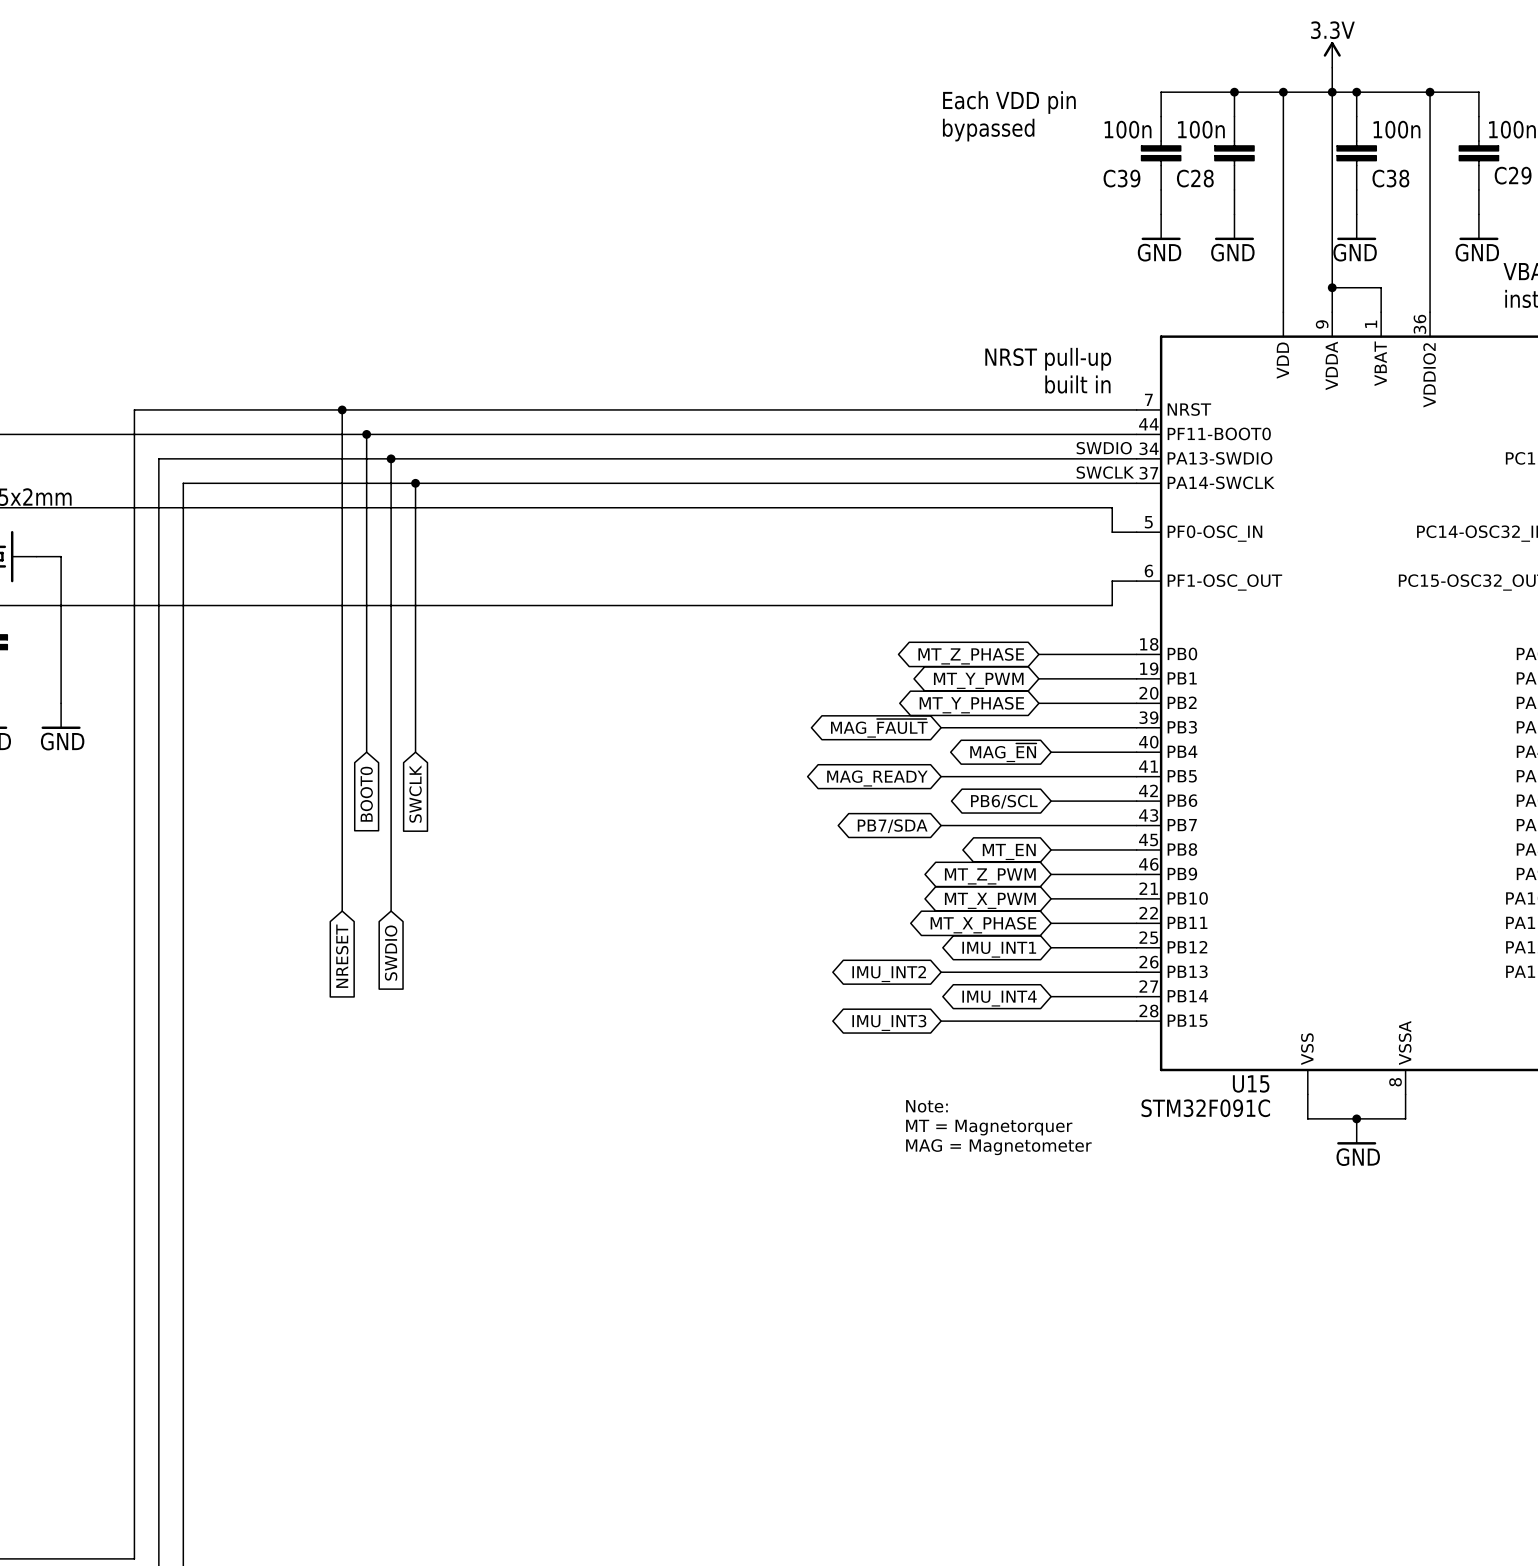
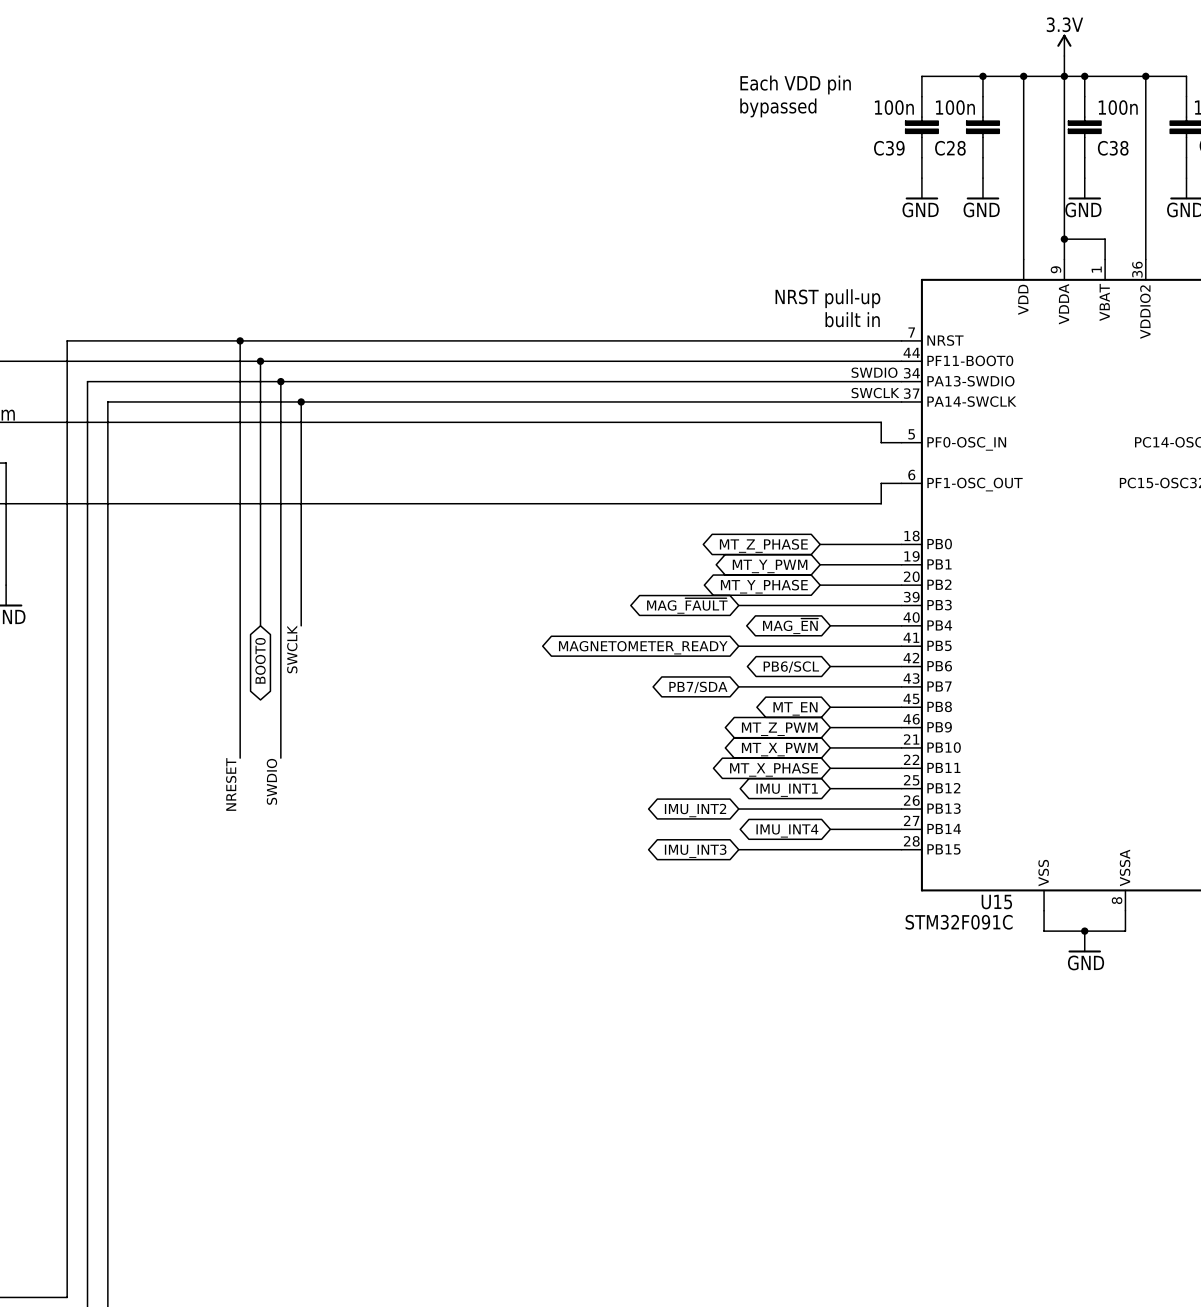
global label: MAG_READY (877, 778) -> MAGNETOMETER_READY (643, 647)
label: none -> SWCLK (292, 649)
global label shape: input (366, 794) -> bidirectional (260, 660)
global label: SWCLK (415, 794) -> none
label: none -> SWDIO (271, 781)
label: none -> NRESET (231, 784)
global label: SWDIO (391, 953) -> none
global label: NRESET (342, 956) -> none
text: Note: (926, 1106) -> none
text: MT = Magnetorquer (989, 1127) -> none
text: MAG = Magnetometer (998, 1147) -> none

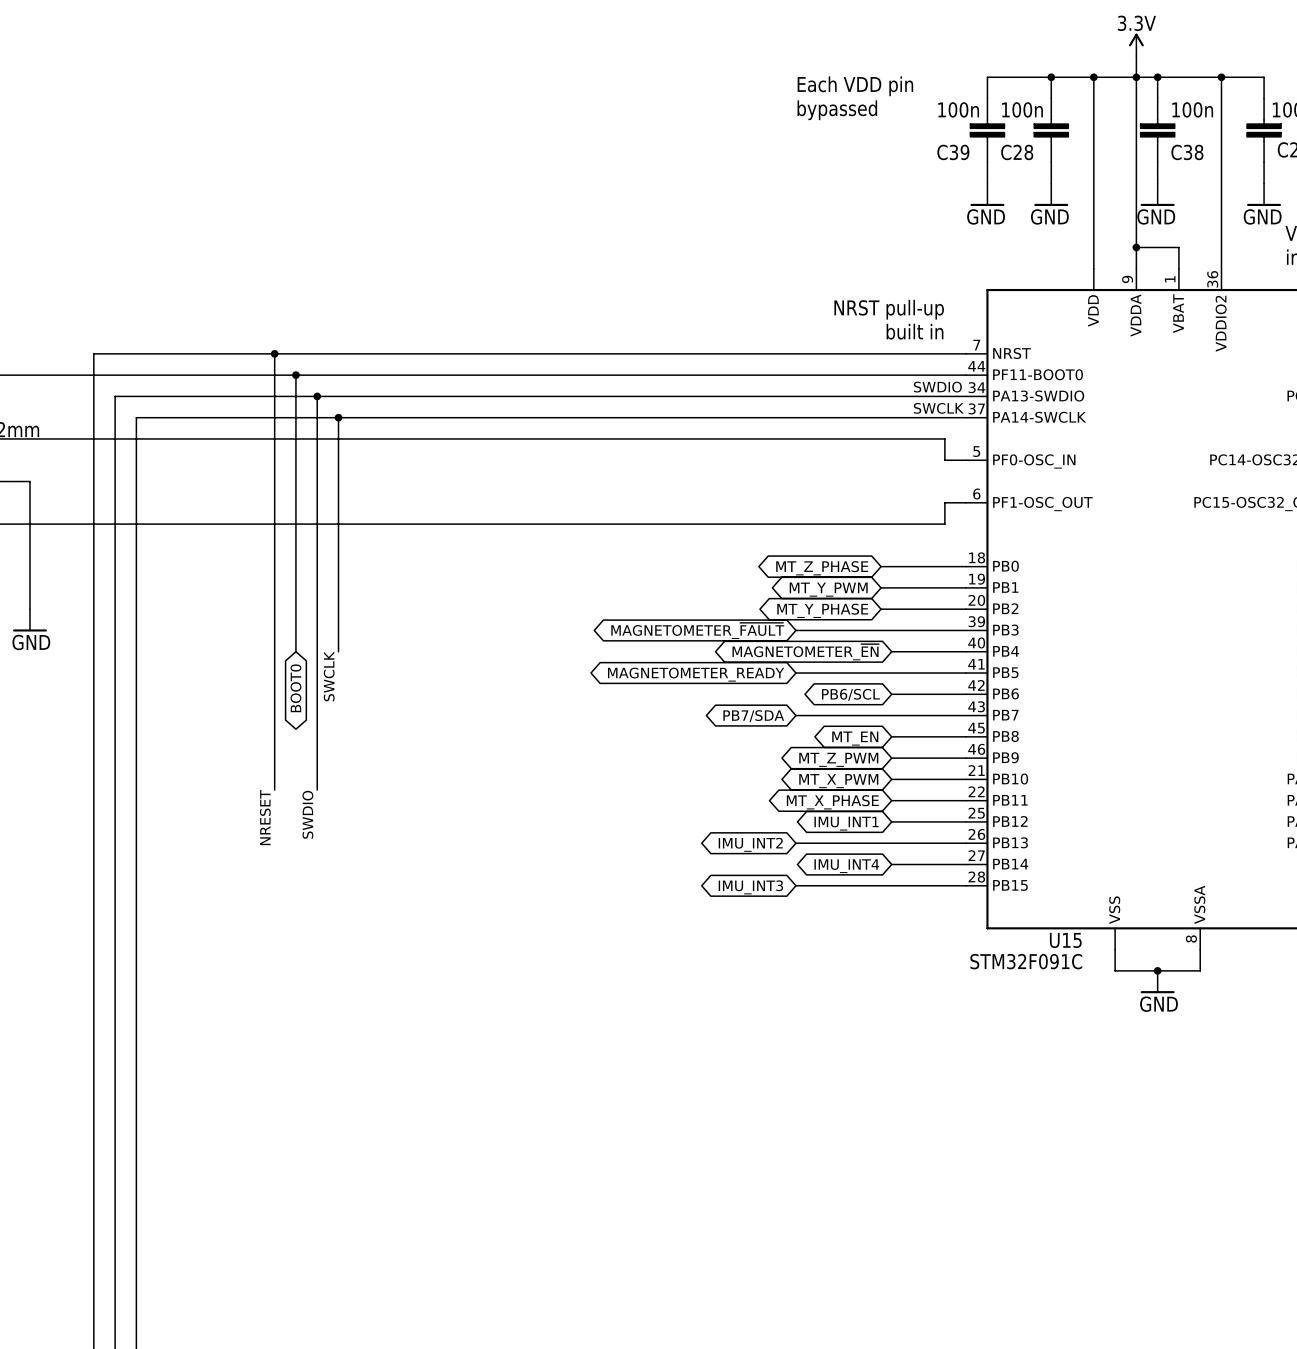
global label: MAG_~{FAULT} (687, 605) -> MAGNETOMETER_~{FAULT} (697, 630)
global label: MAG_~{EN} (790, 626) -> MAGNETOMETER_~{EN} (805, 652)

